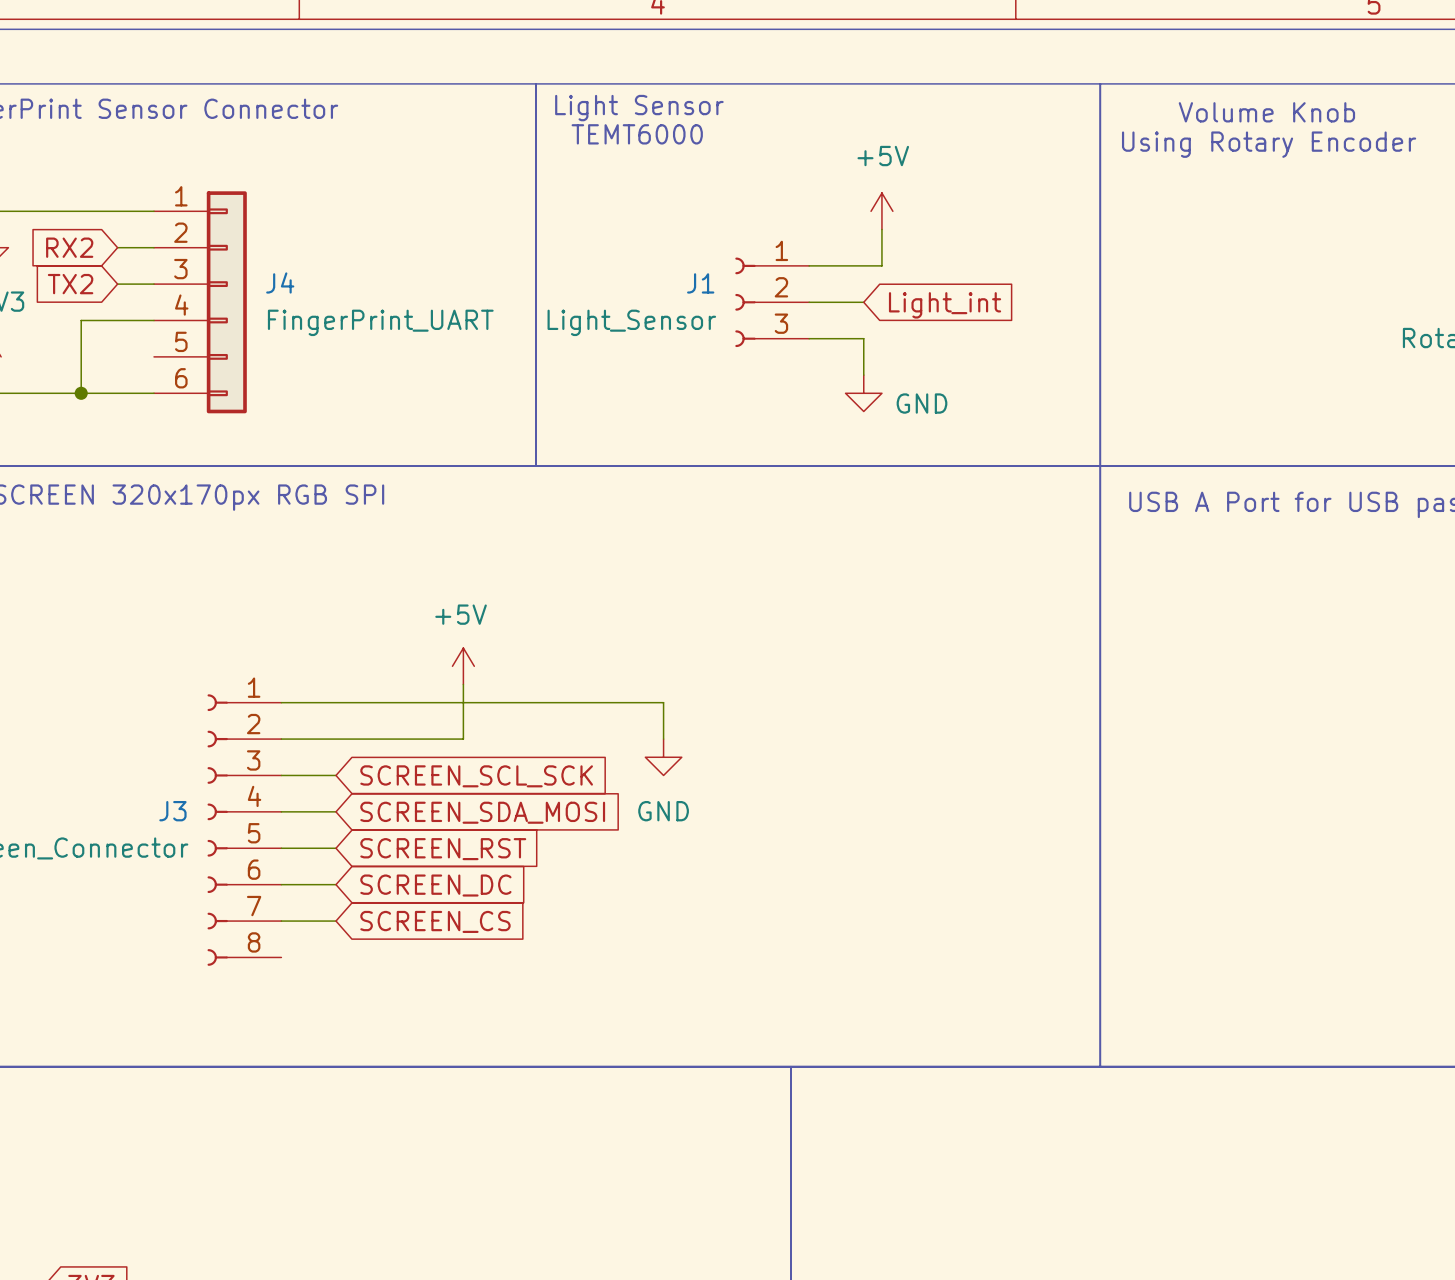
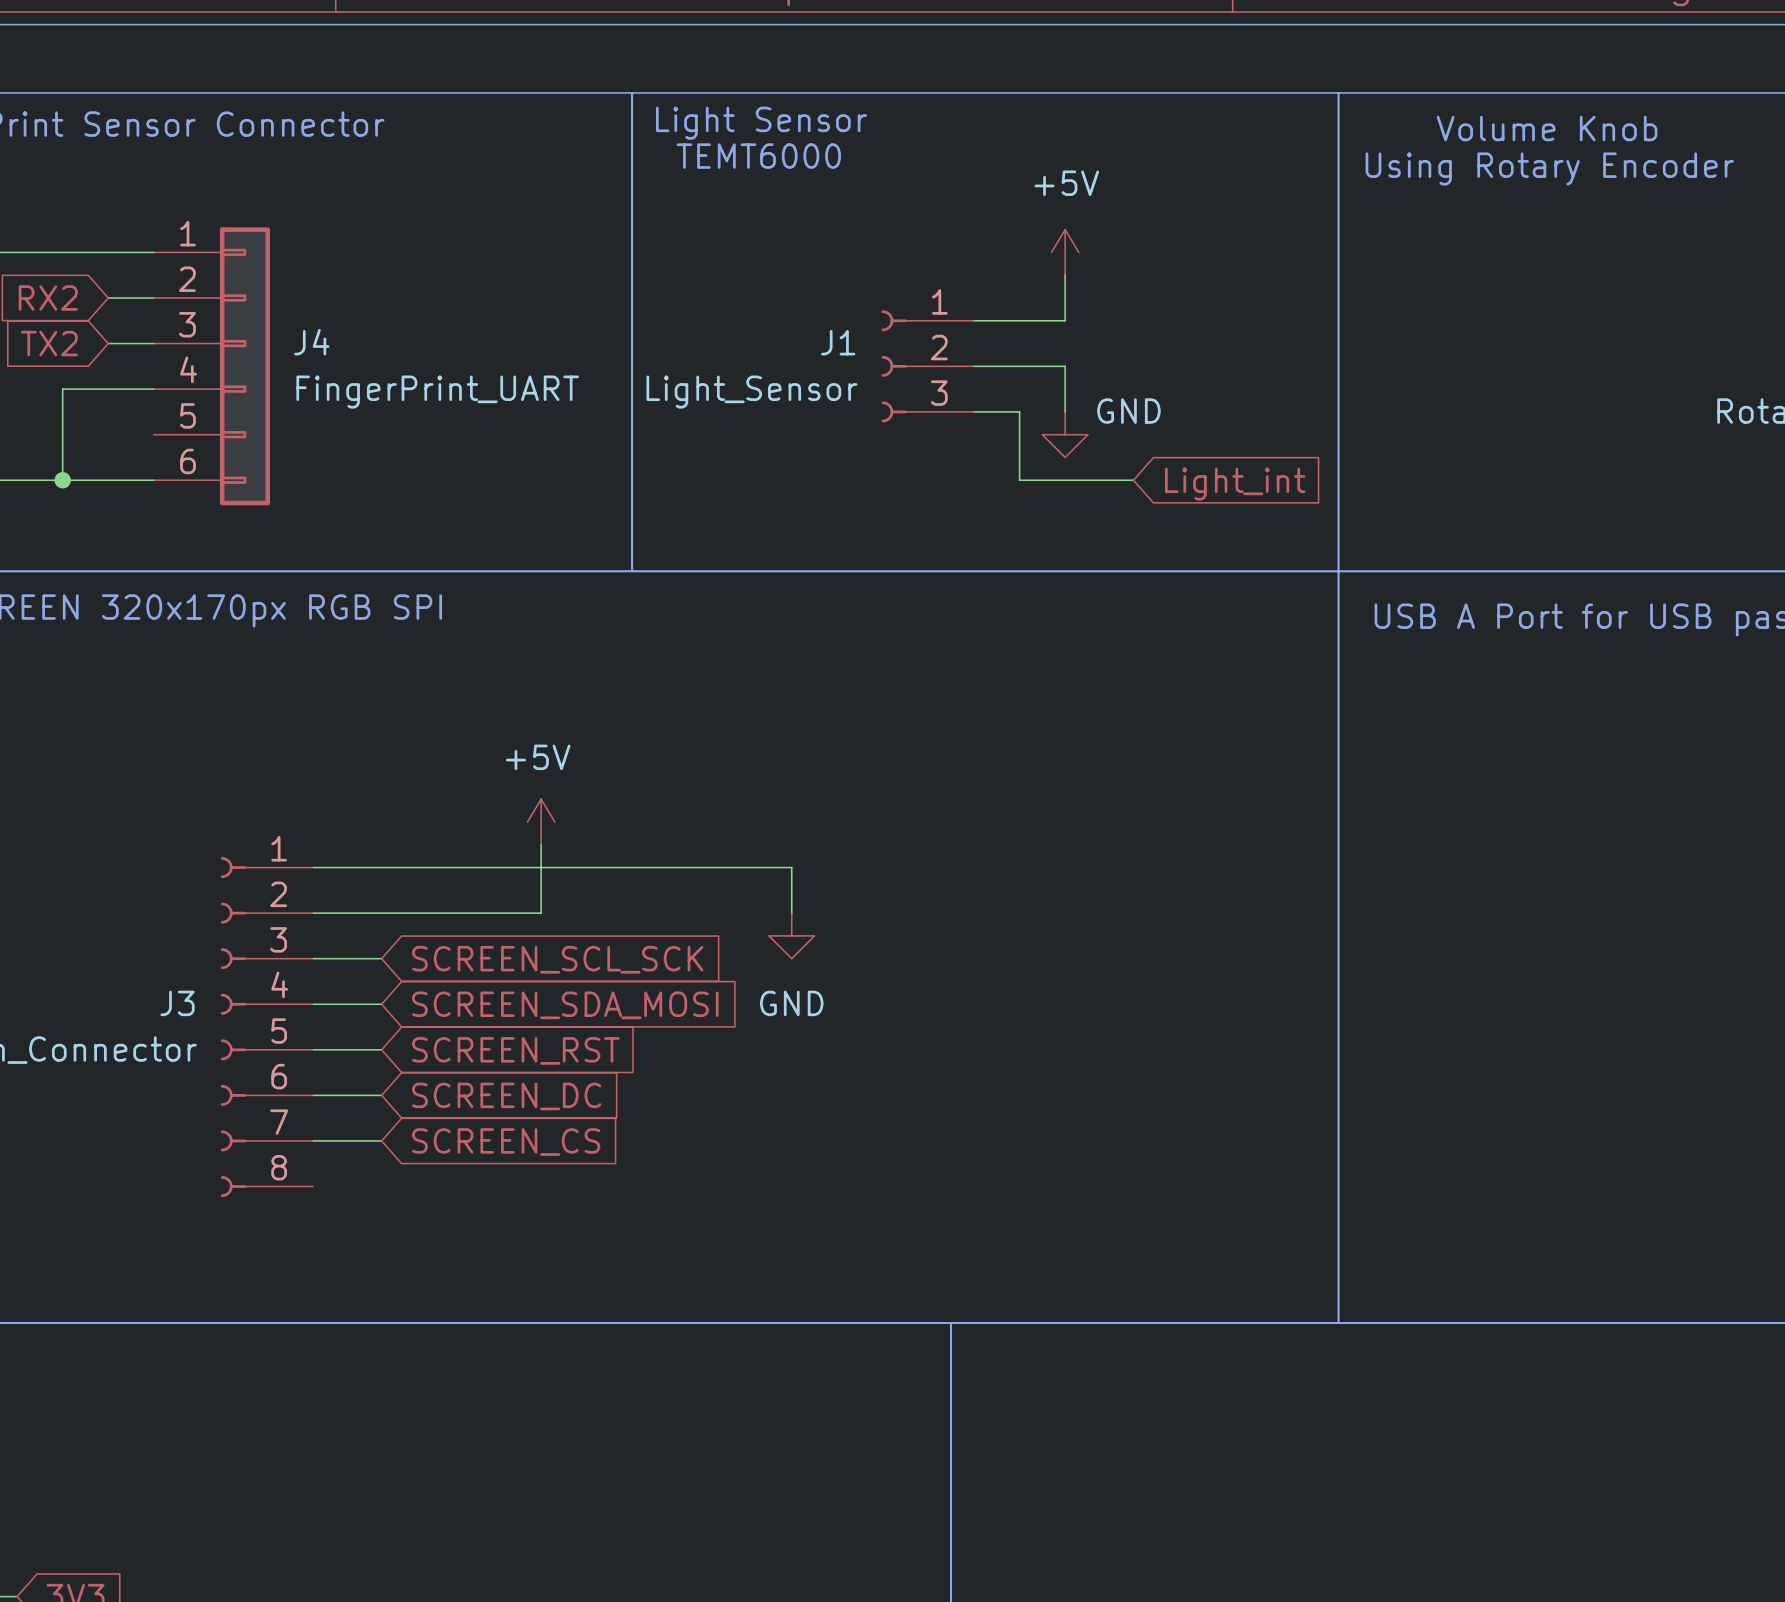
wire: none -> (1042, 366) (1065, 366) (1065, 411)
global label position: Light_int (945, 305) -> Light_int (1235, 484)
wire: (845, 338) (863, 338) (863, 375) -> (1019, 411) (1019, 480) (1133, 480)
power symbol position: GND (863, 393) -> GND (1065, 434)
power symbol text position: GND (921, 403) -> GND (1128, 411)

